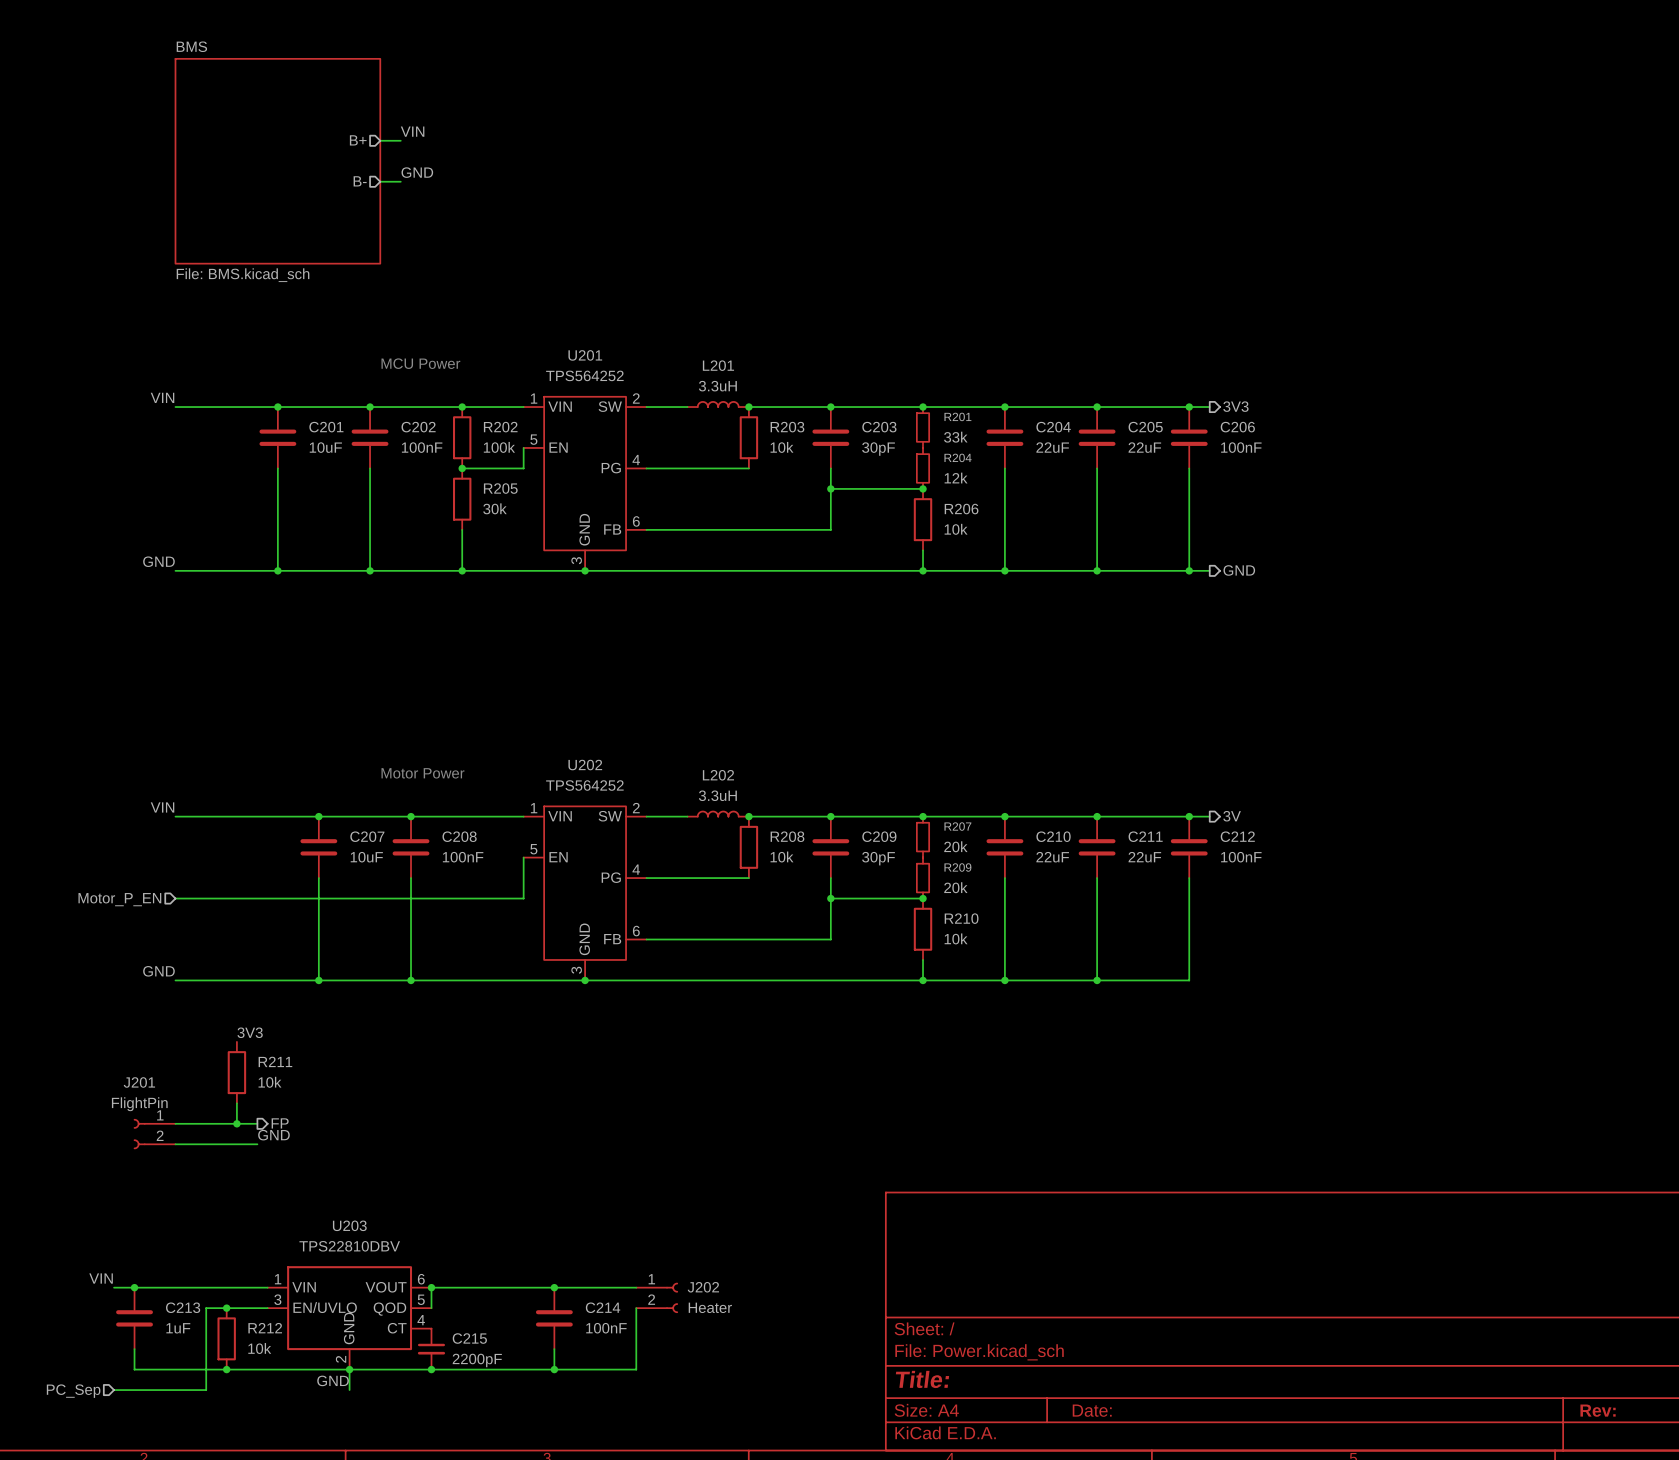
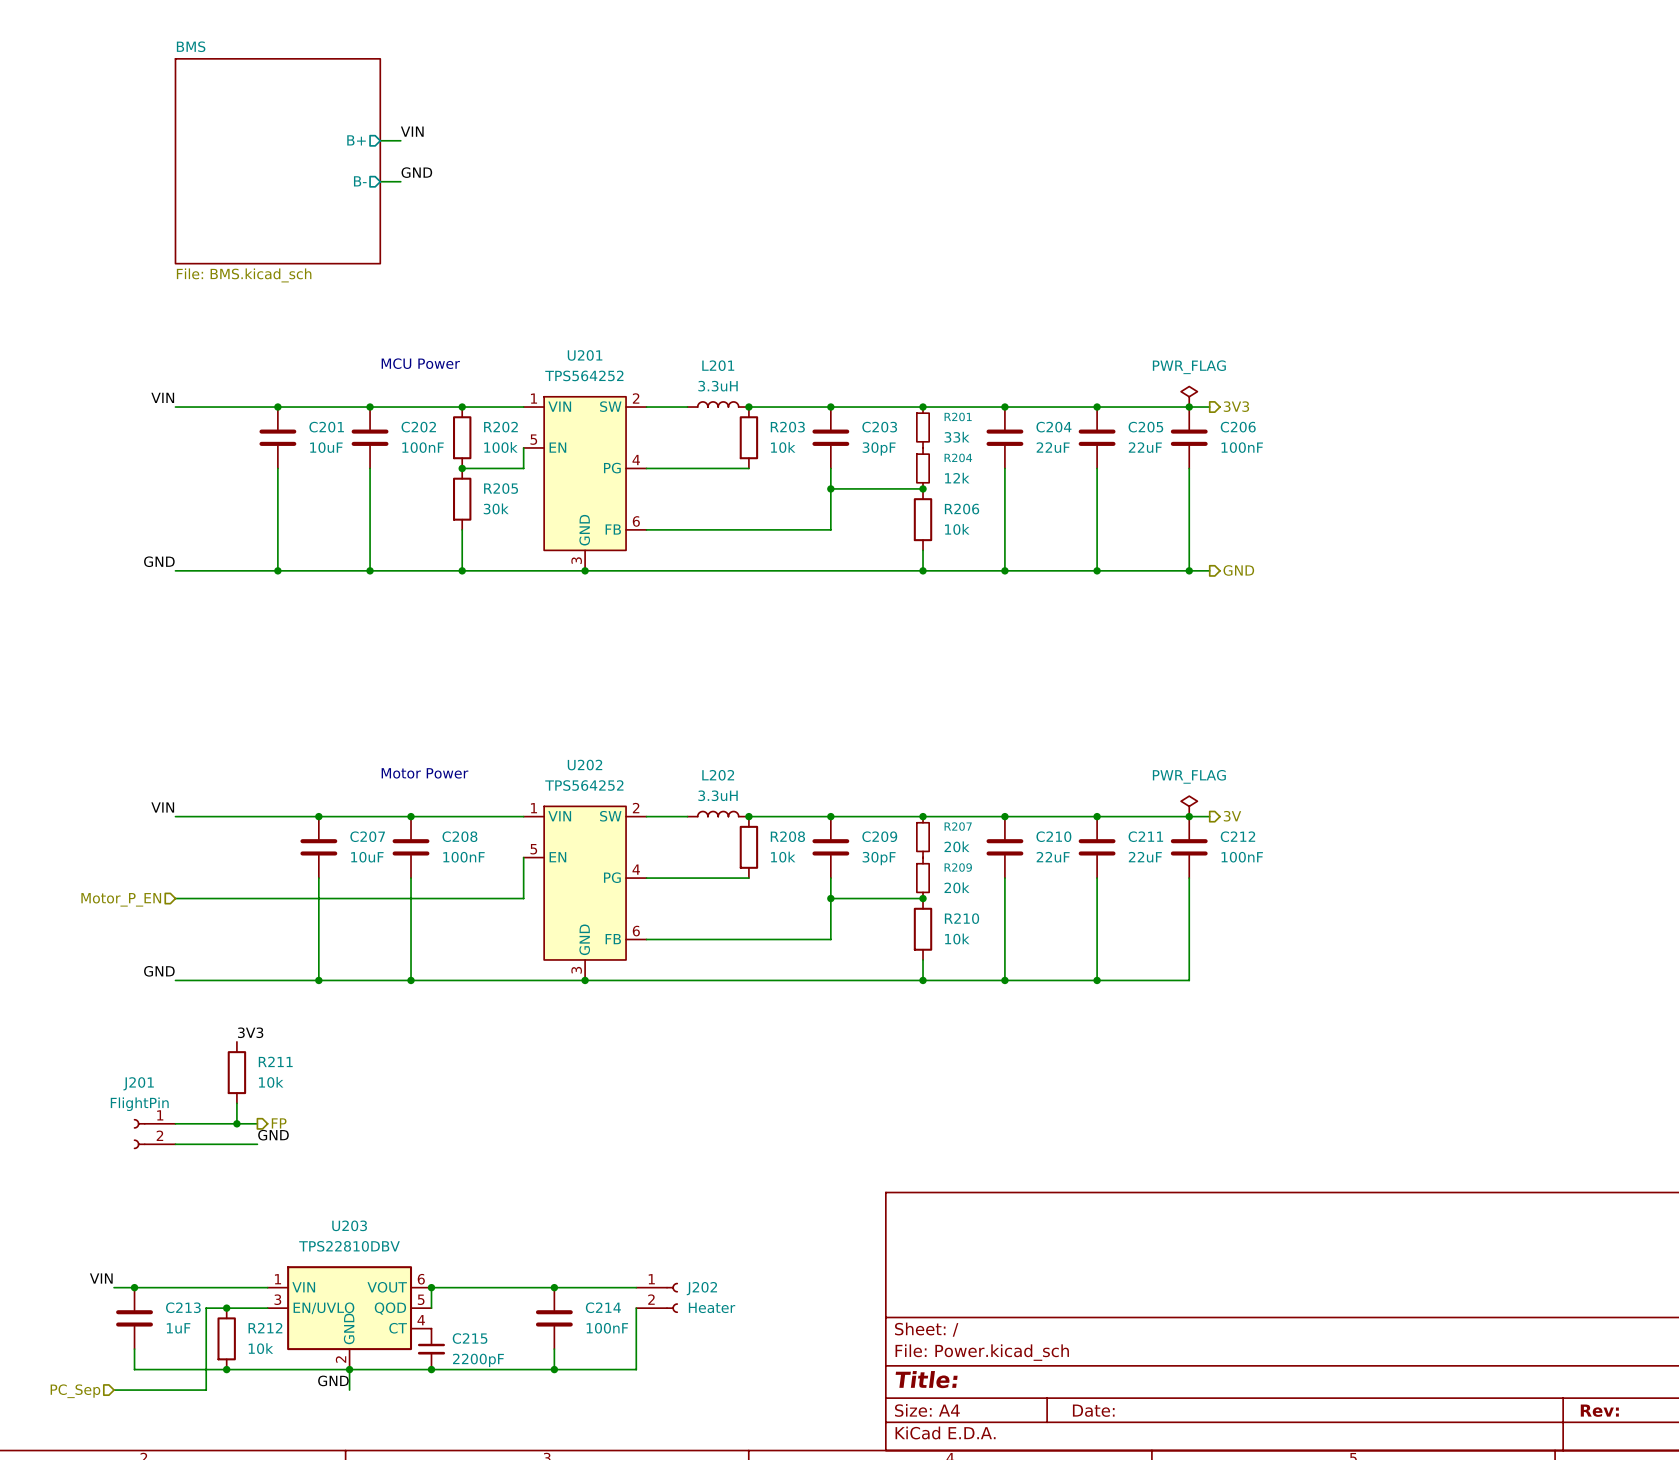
power symbol: none -> PWR_FLAG (1189, 396)
power symbol: none -> PWR_FLAG (1189, 806)

